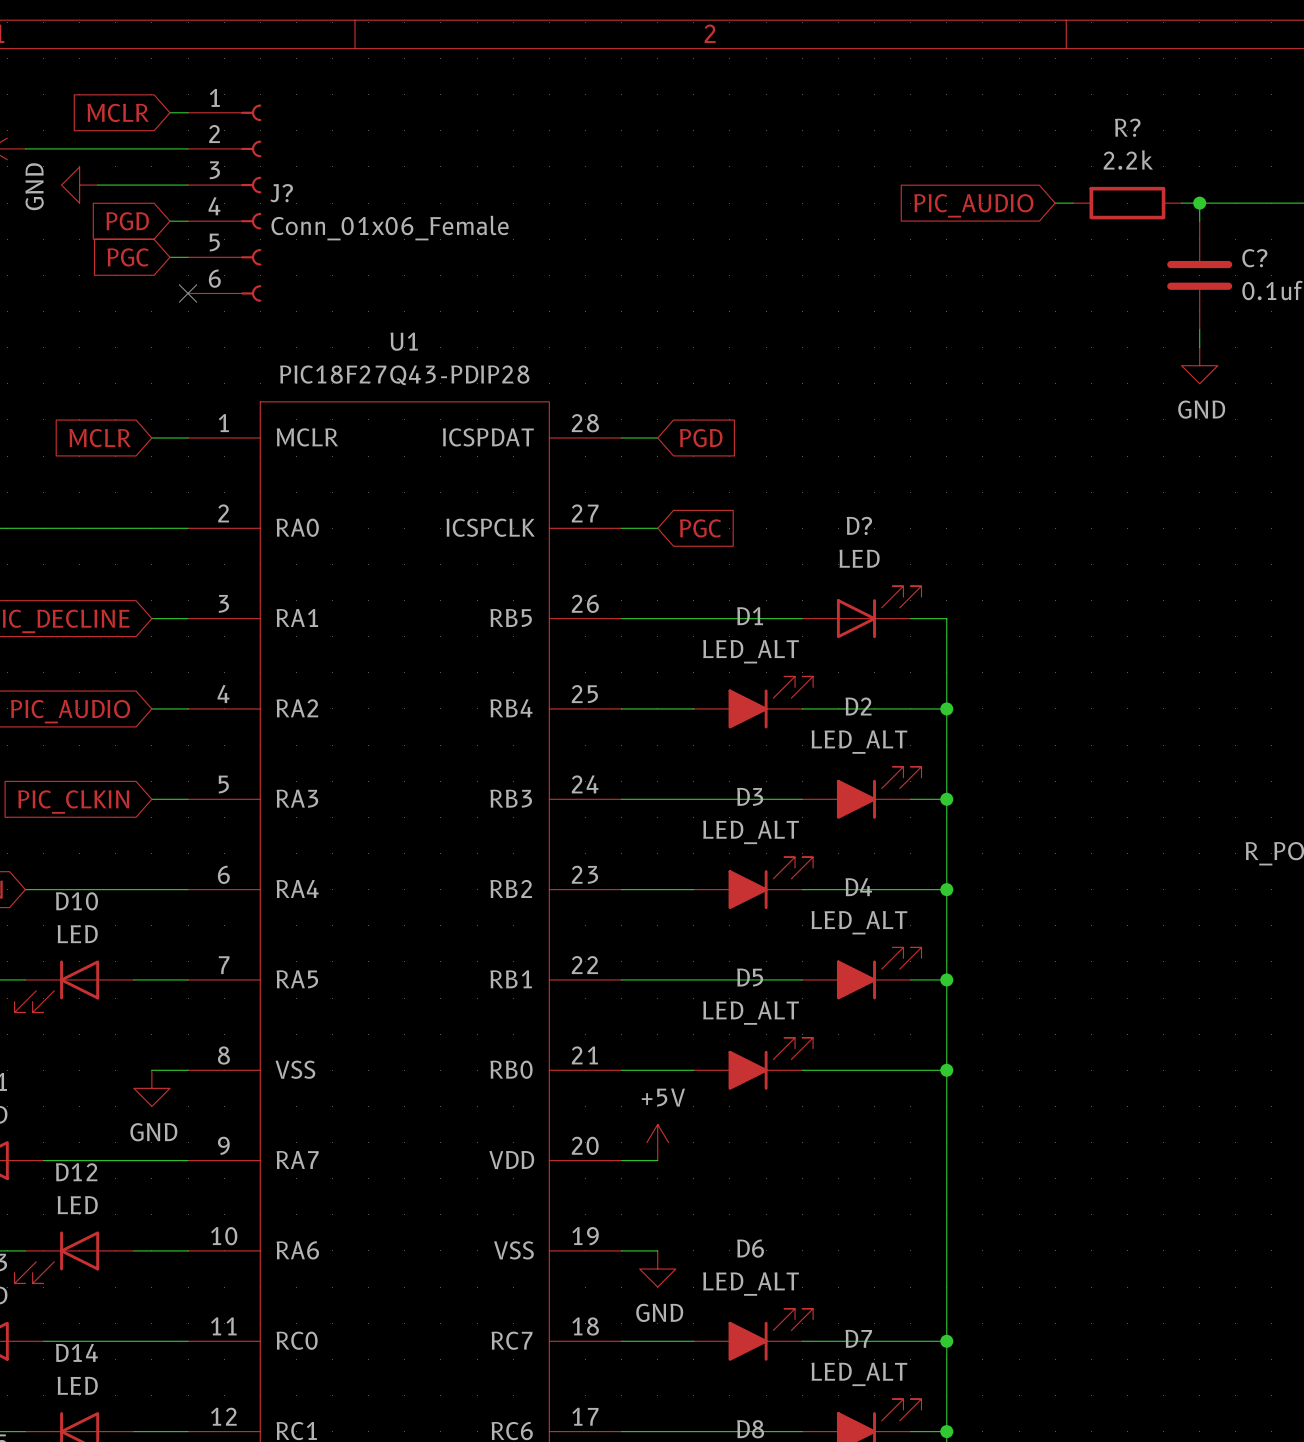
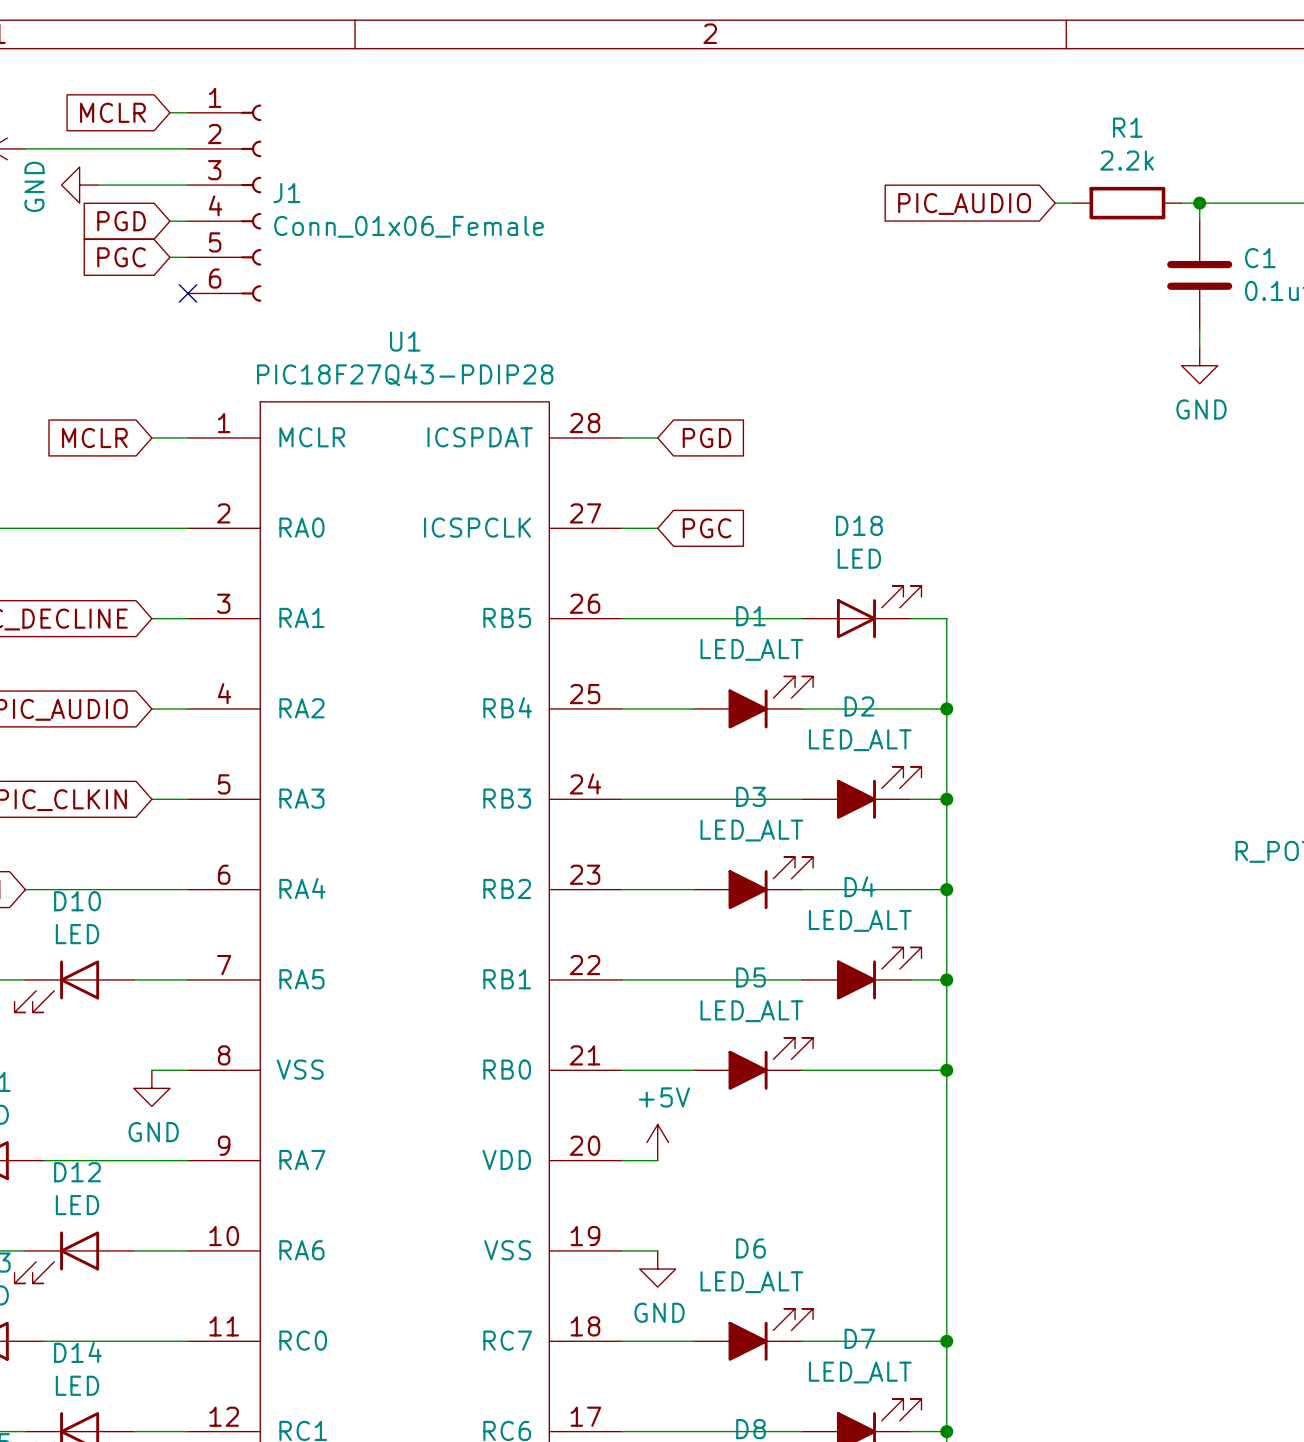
R? name: R? (1127, 127) -> R1 (1127, 127)
J? name: J? (281, 193) -> J1 (286, 193)
C? name: C? (1254, 258) -> C1 (1260, 258)
D? name: D? (859, 525) -> D18 (859, 525)

